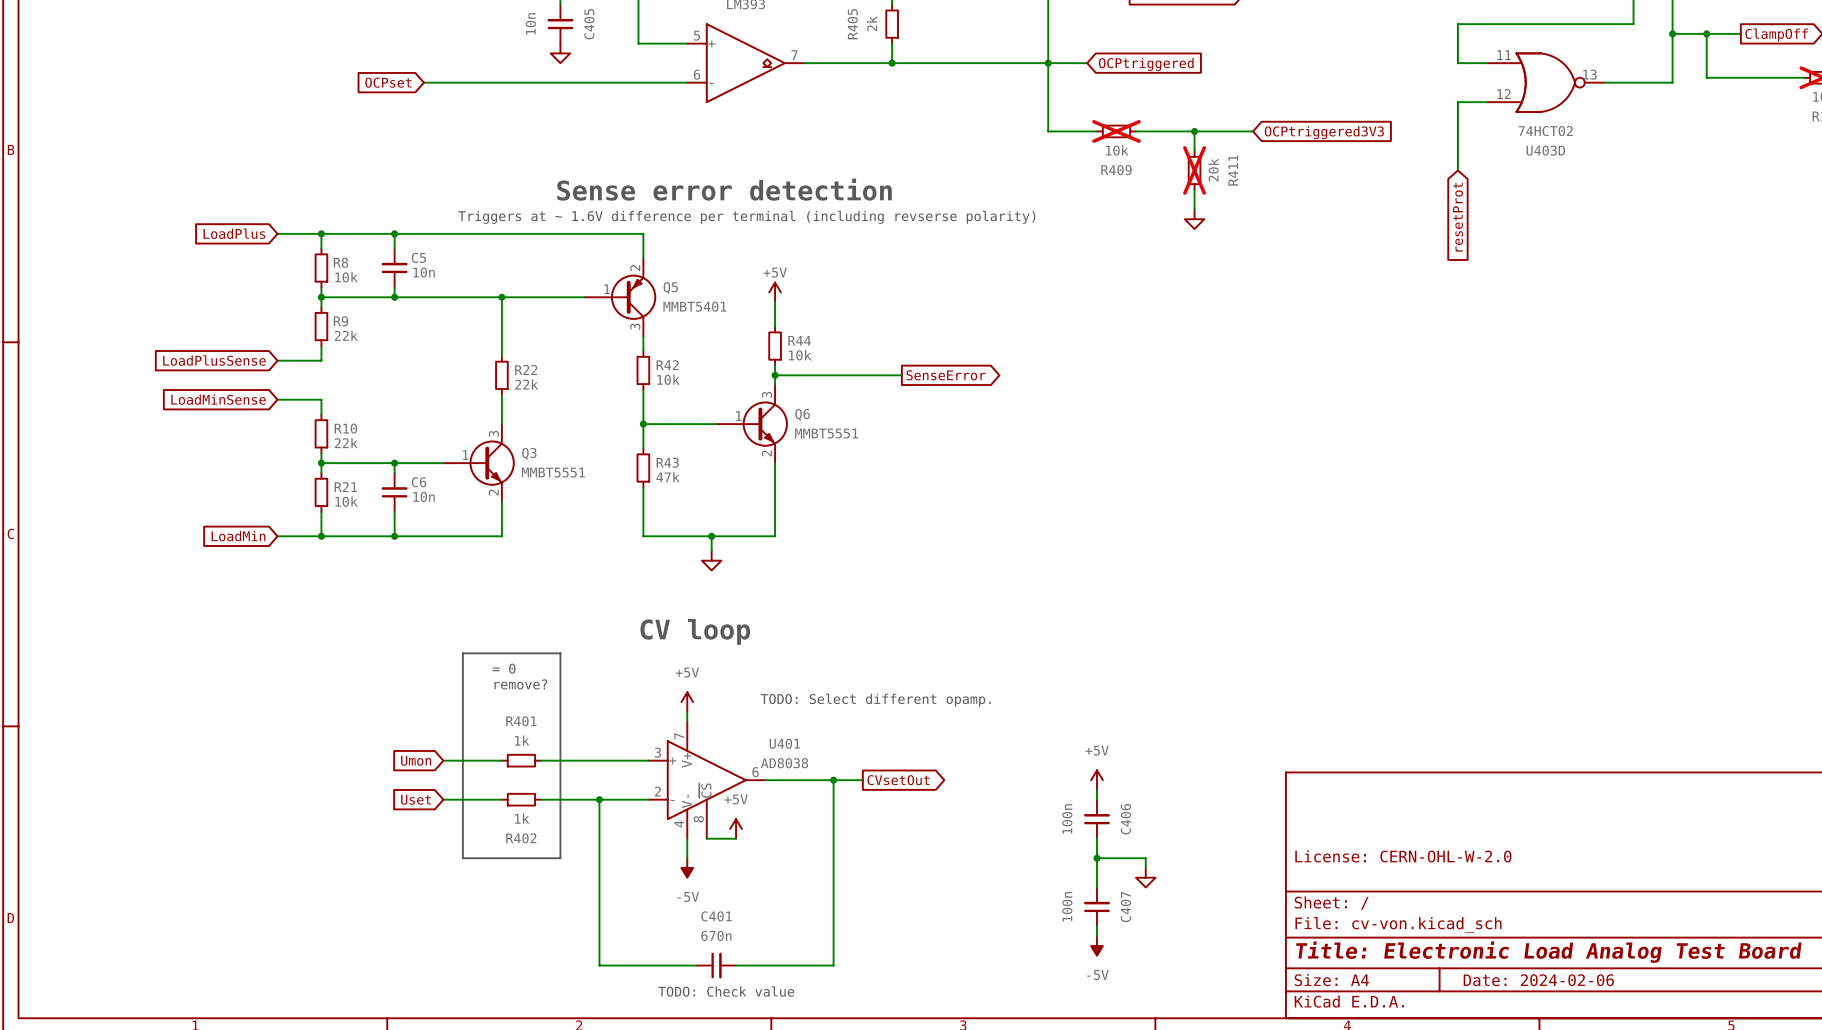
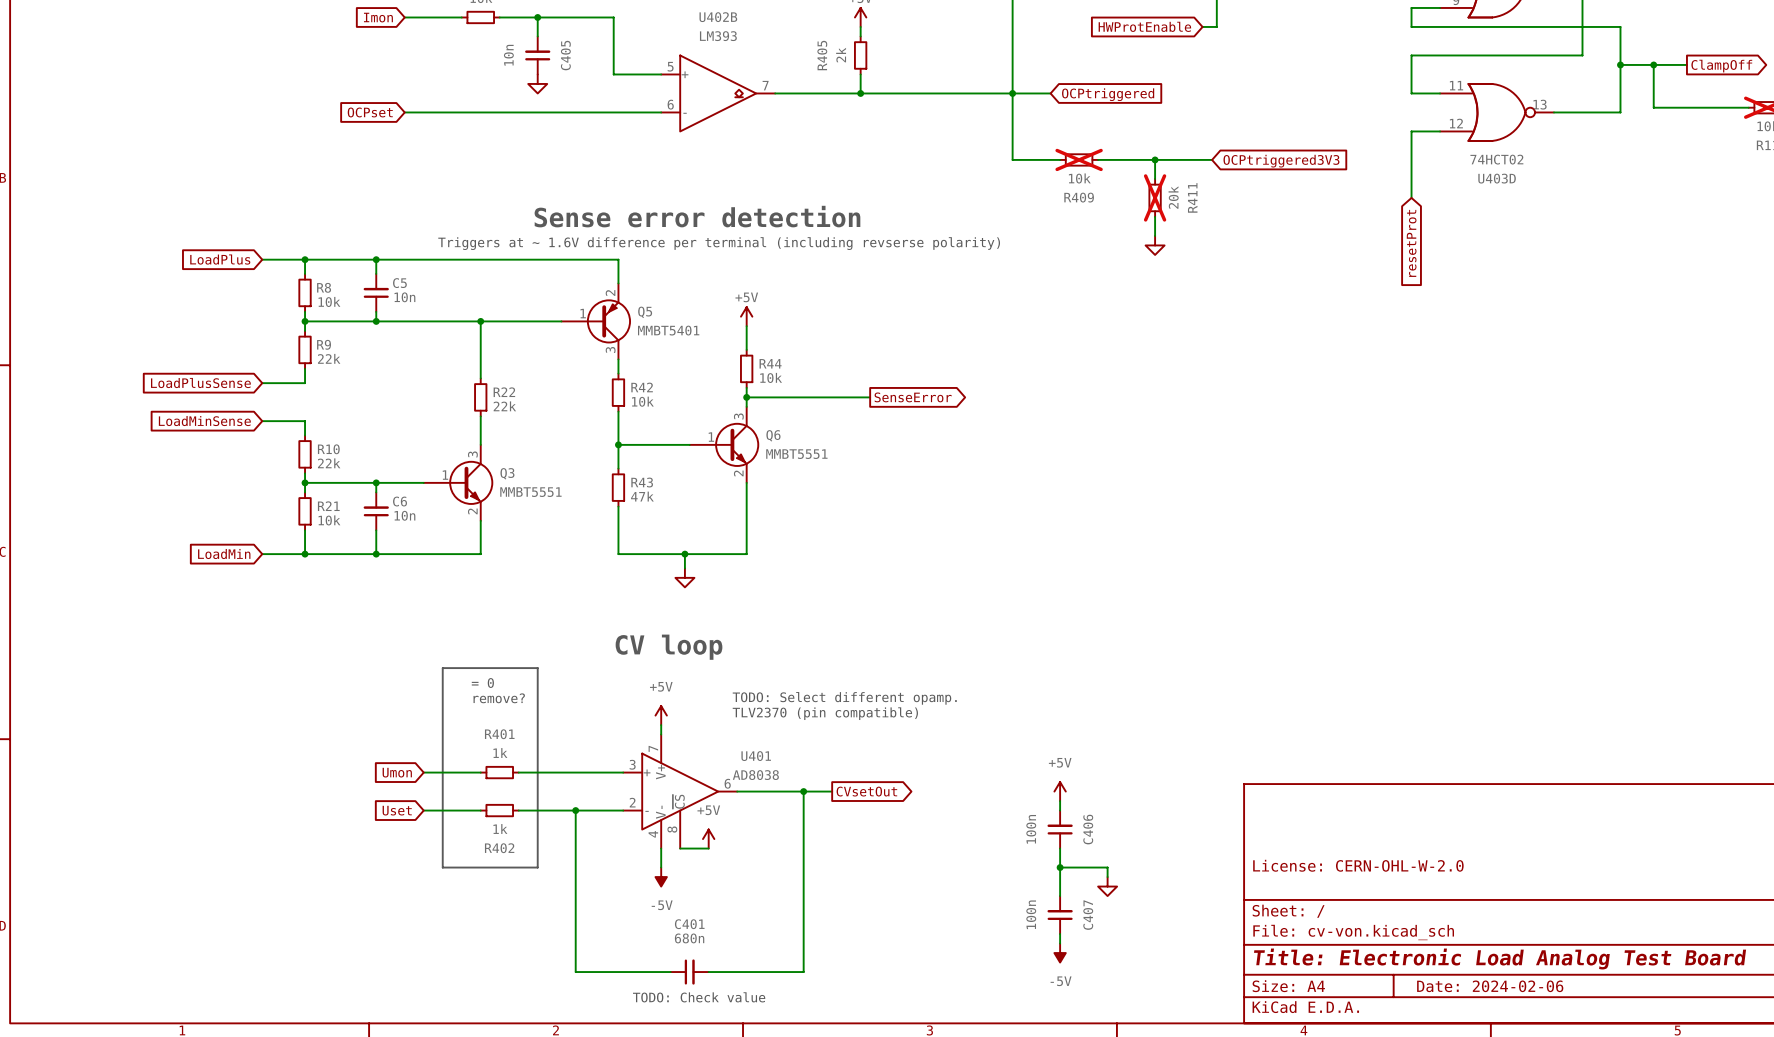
text: none -> TODO: Select different opamp. (844, 698)
text: TODO: Select different opamp. (875, 700) -> TLV2370 (pin compatible) (825, 713)
C401 value: 670n (716, 935) -> 680n (689, 938)

